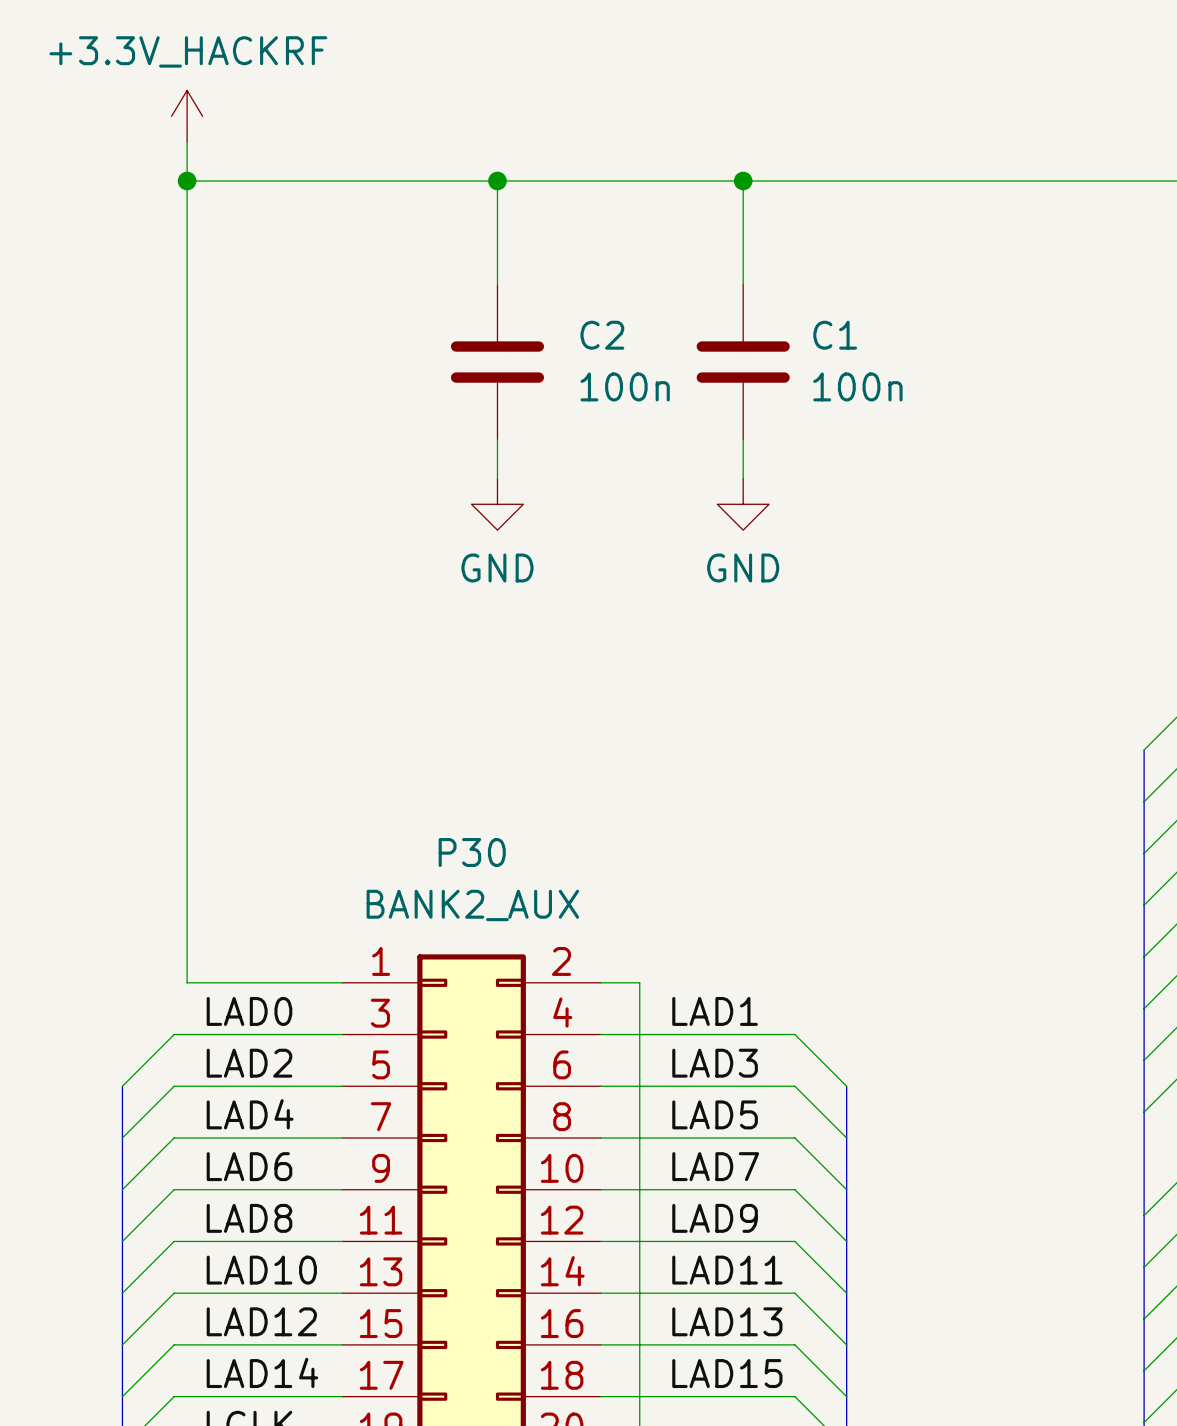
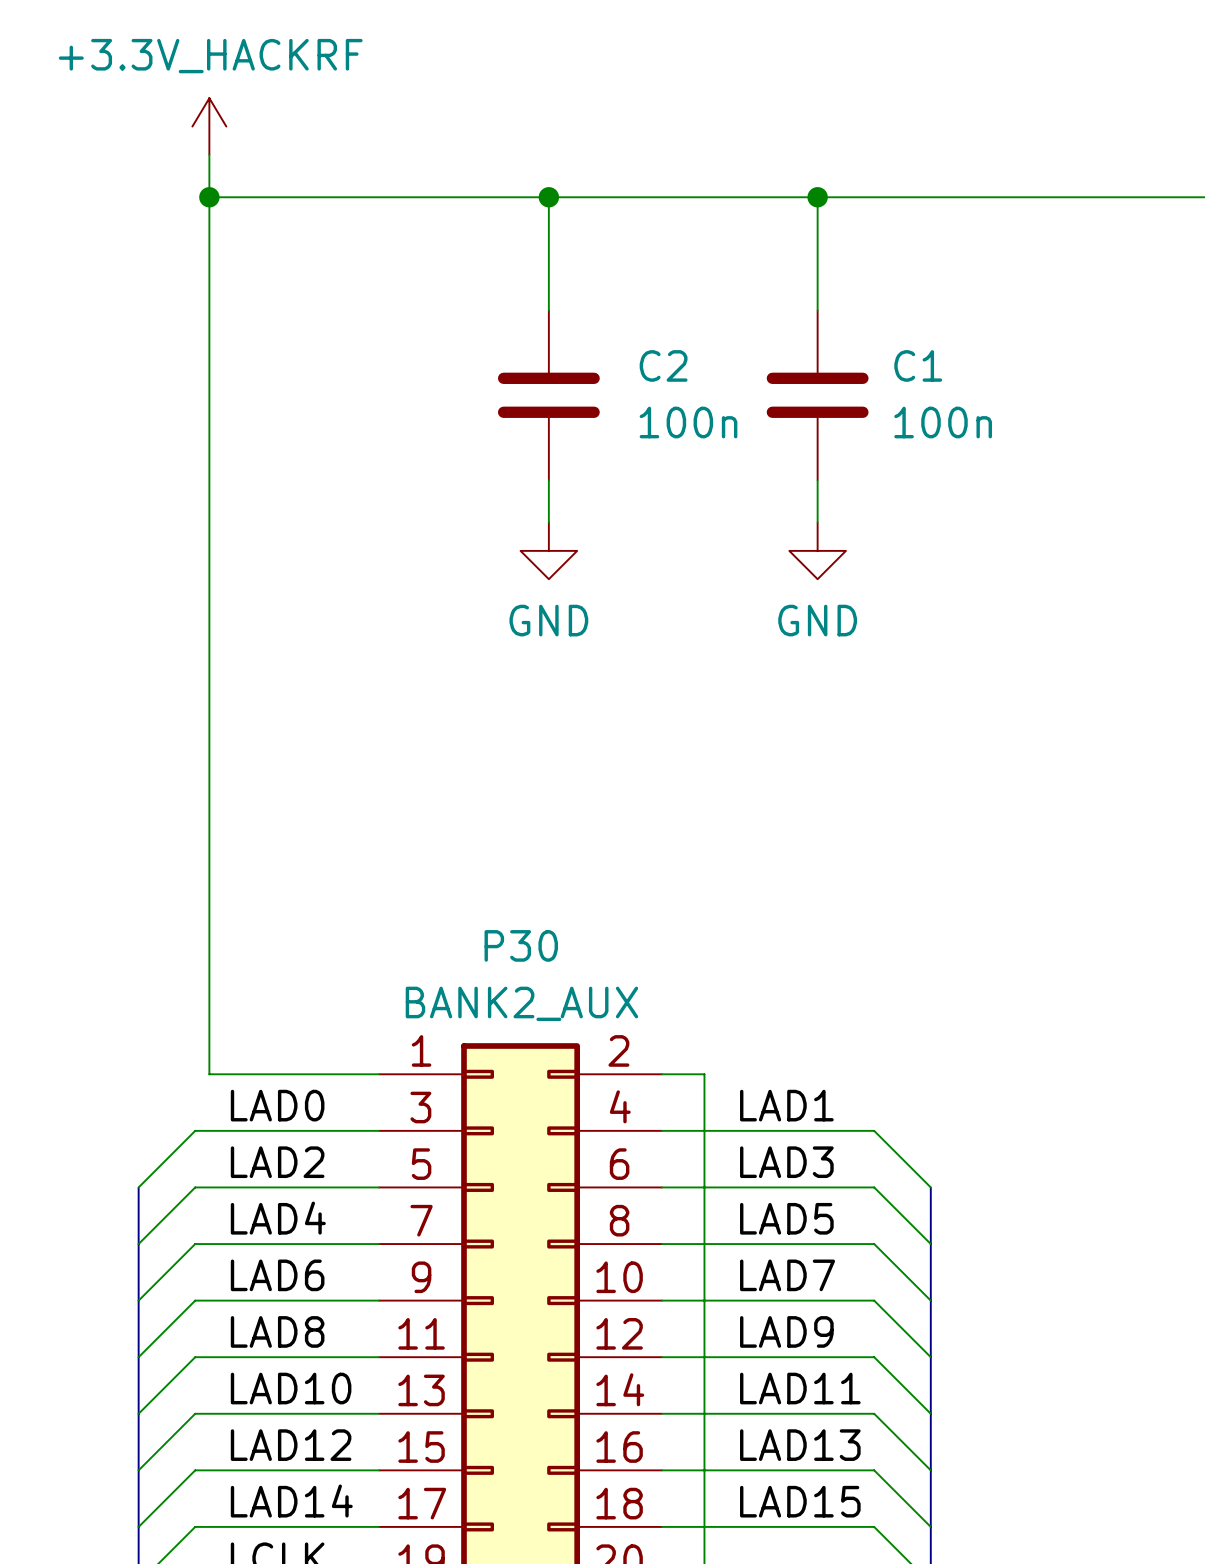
P30 name position: P30 (472, 852) -> P30 (521, 945)
P30 value position: BANK2_AUX (472, 905) -> BANK2_AUX (521, 1003)

